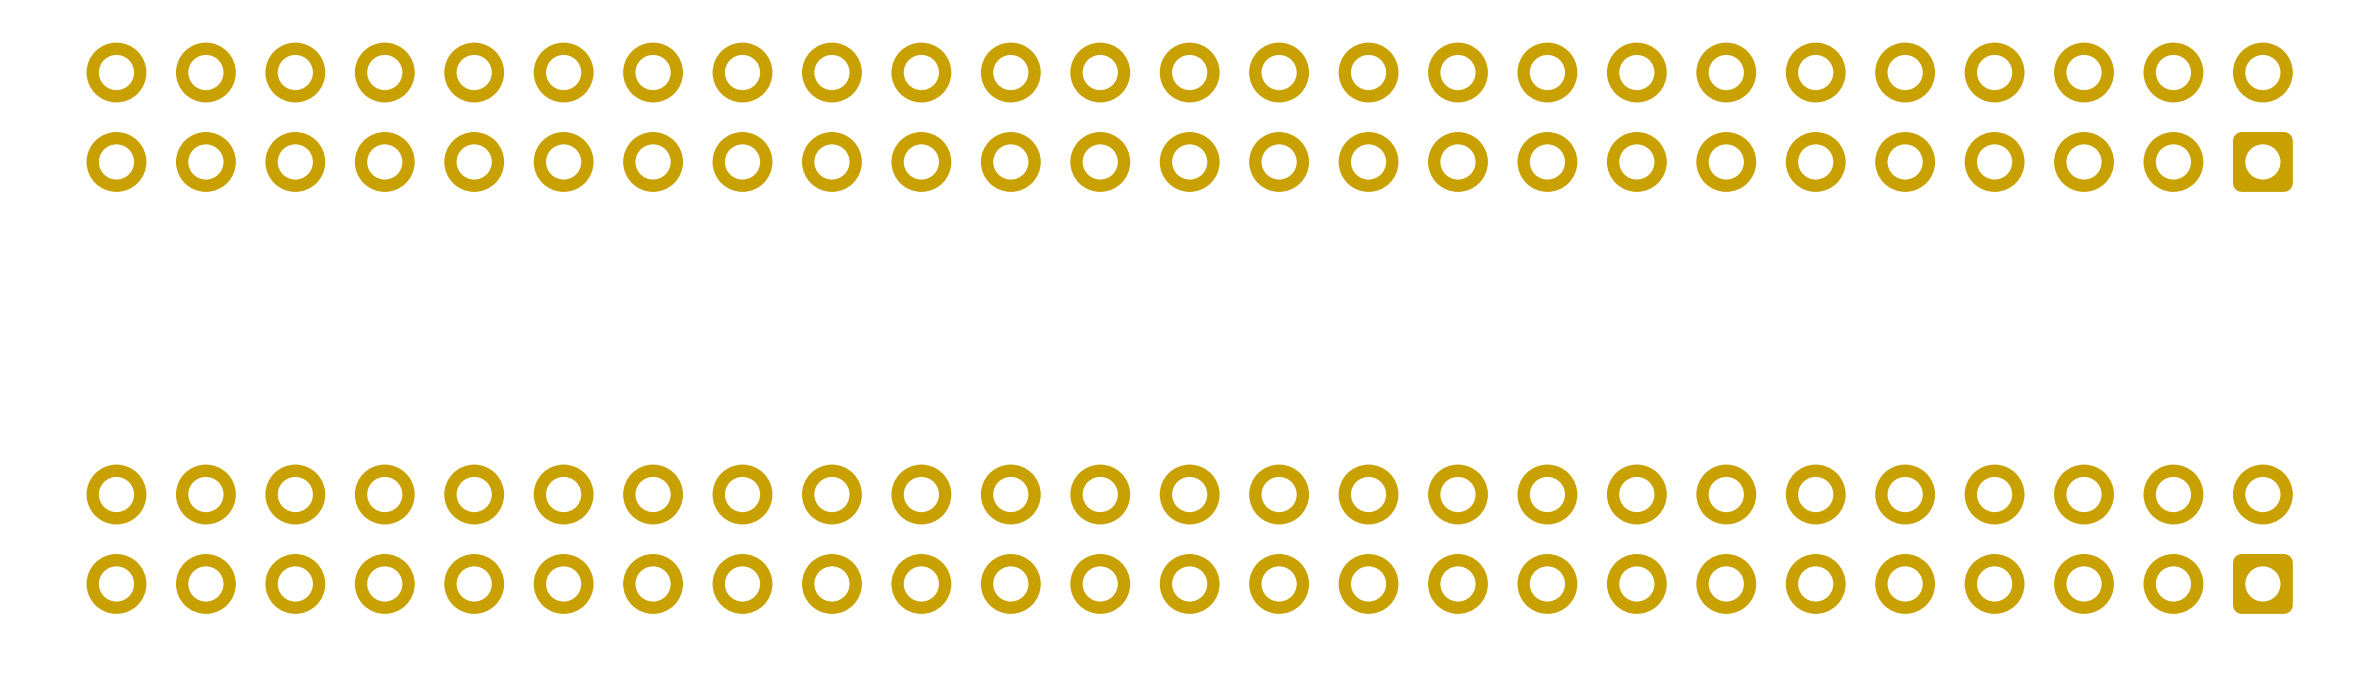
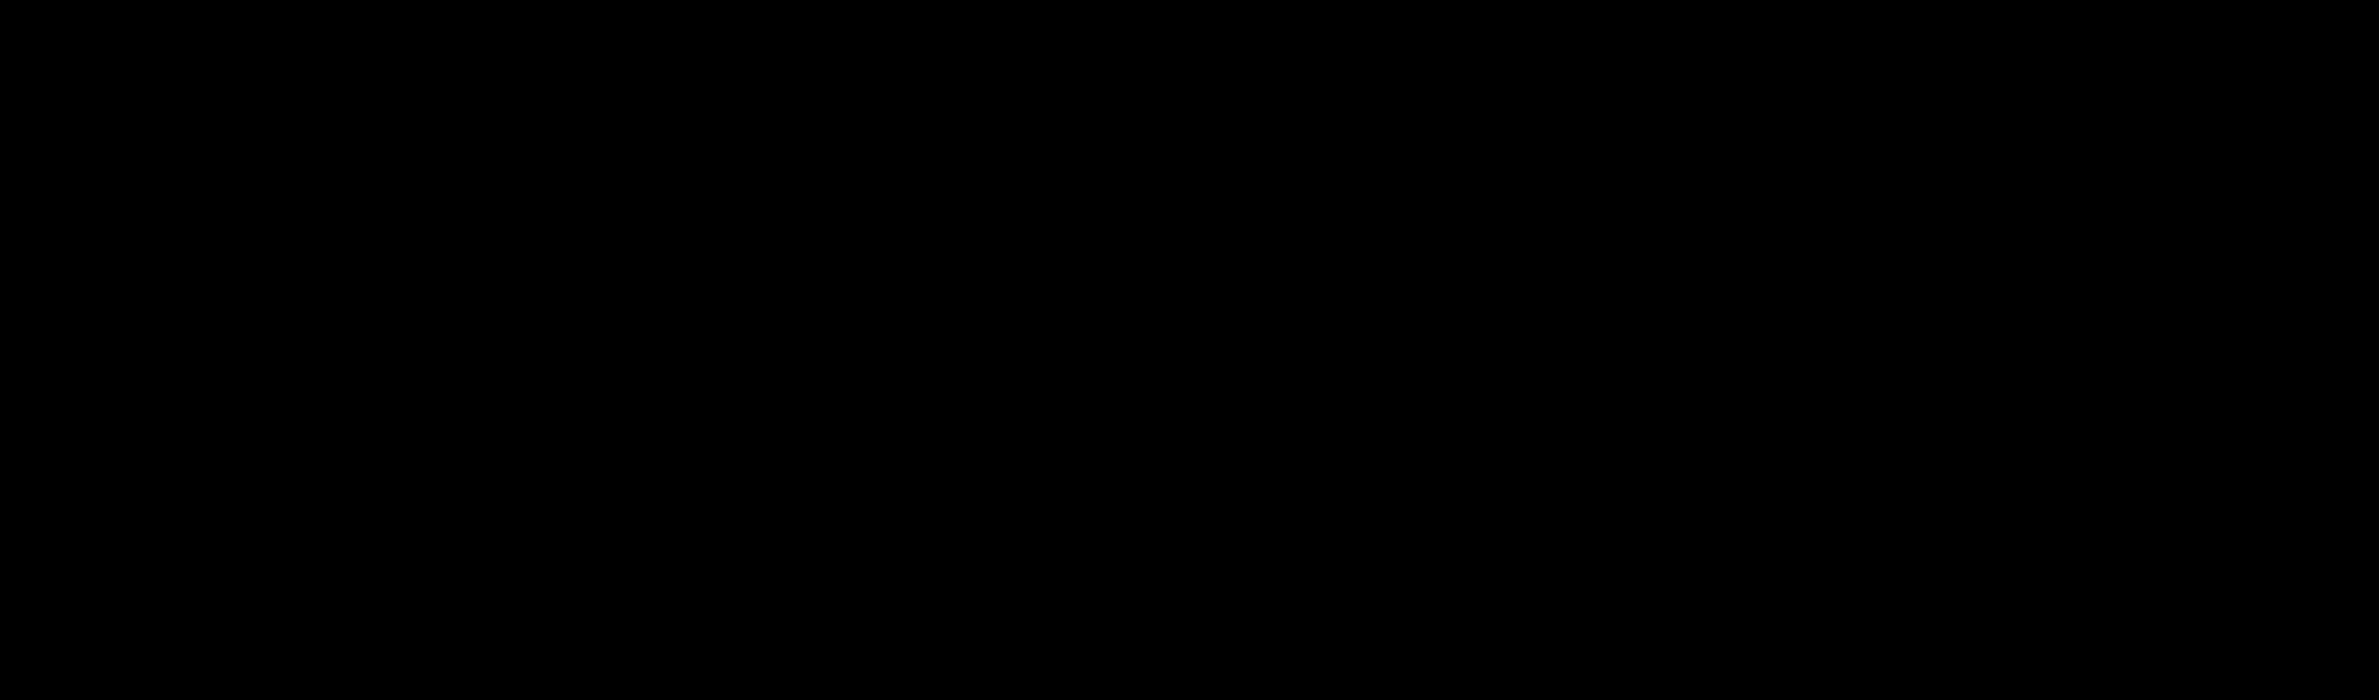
part: (1189, 117) -> none
part: (1189, 539) -> none

